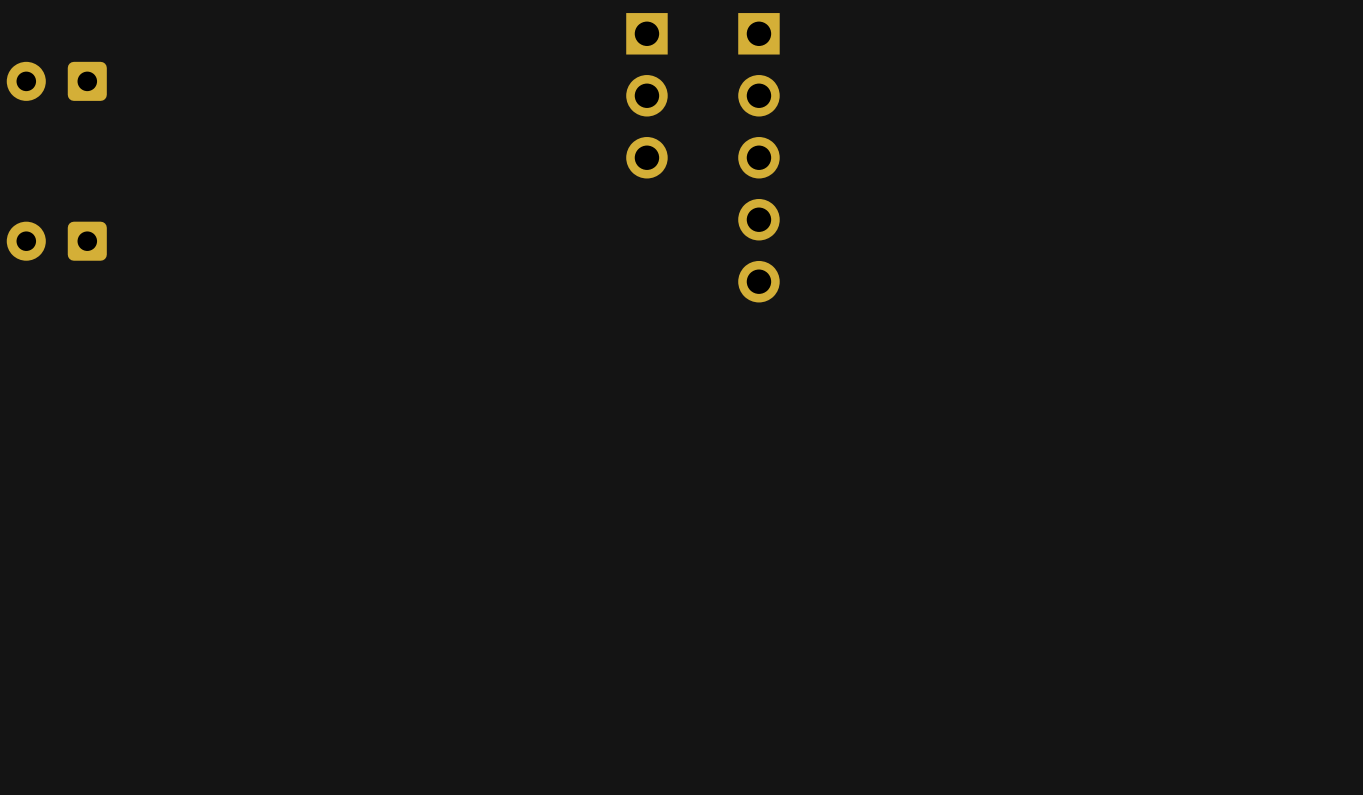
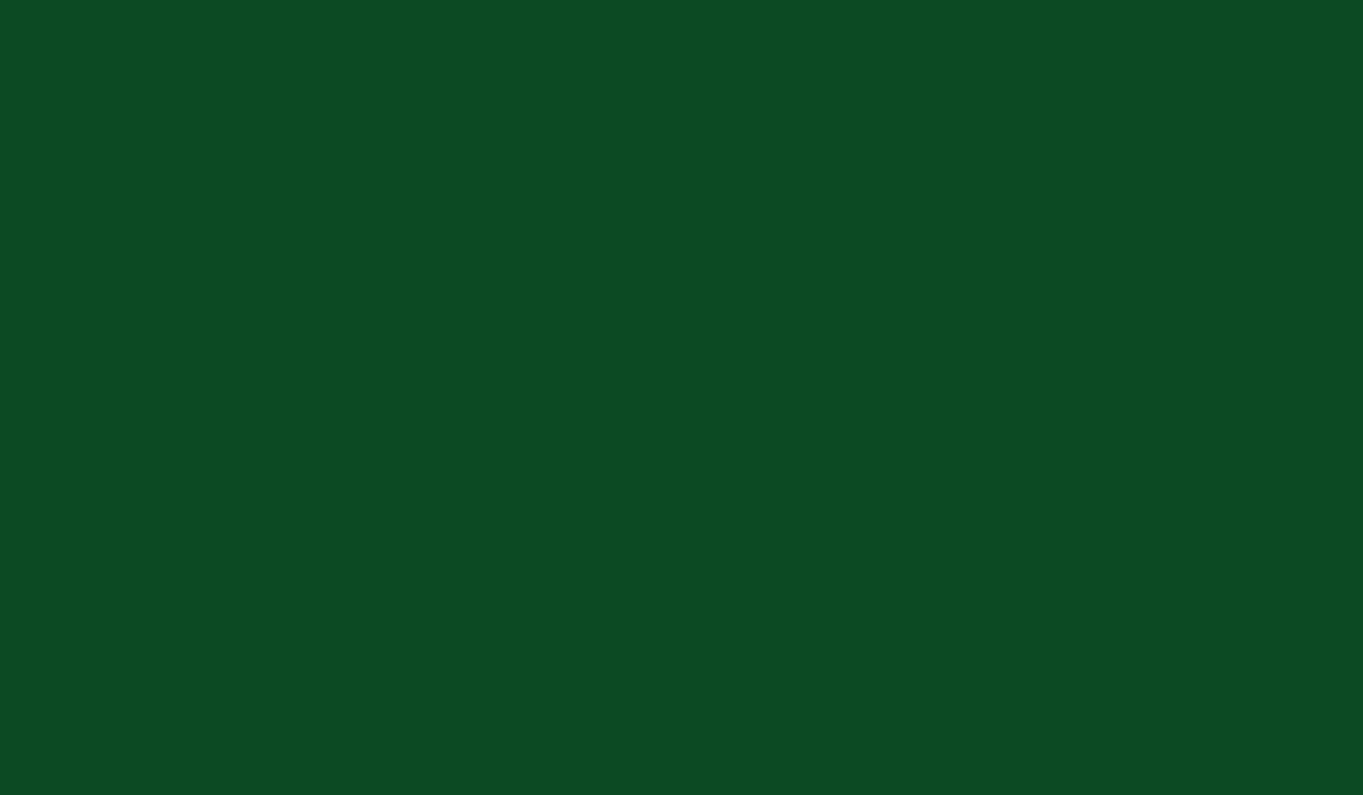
part: (56, 81) -> none
part: (646, 95) -> none
part: (758, 157) -> none
part: (56, 241) -> none

